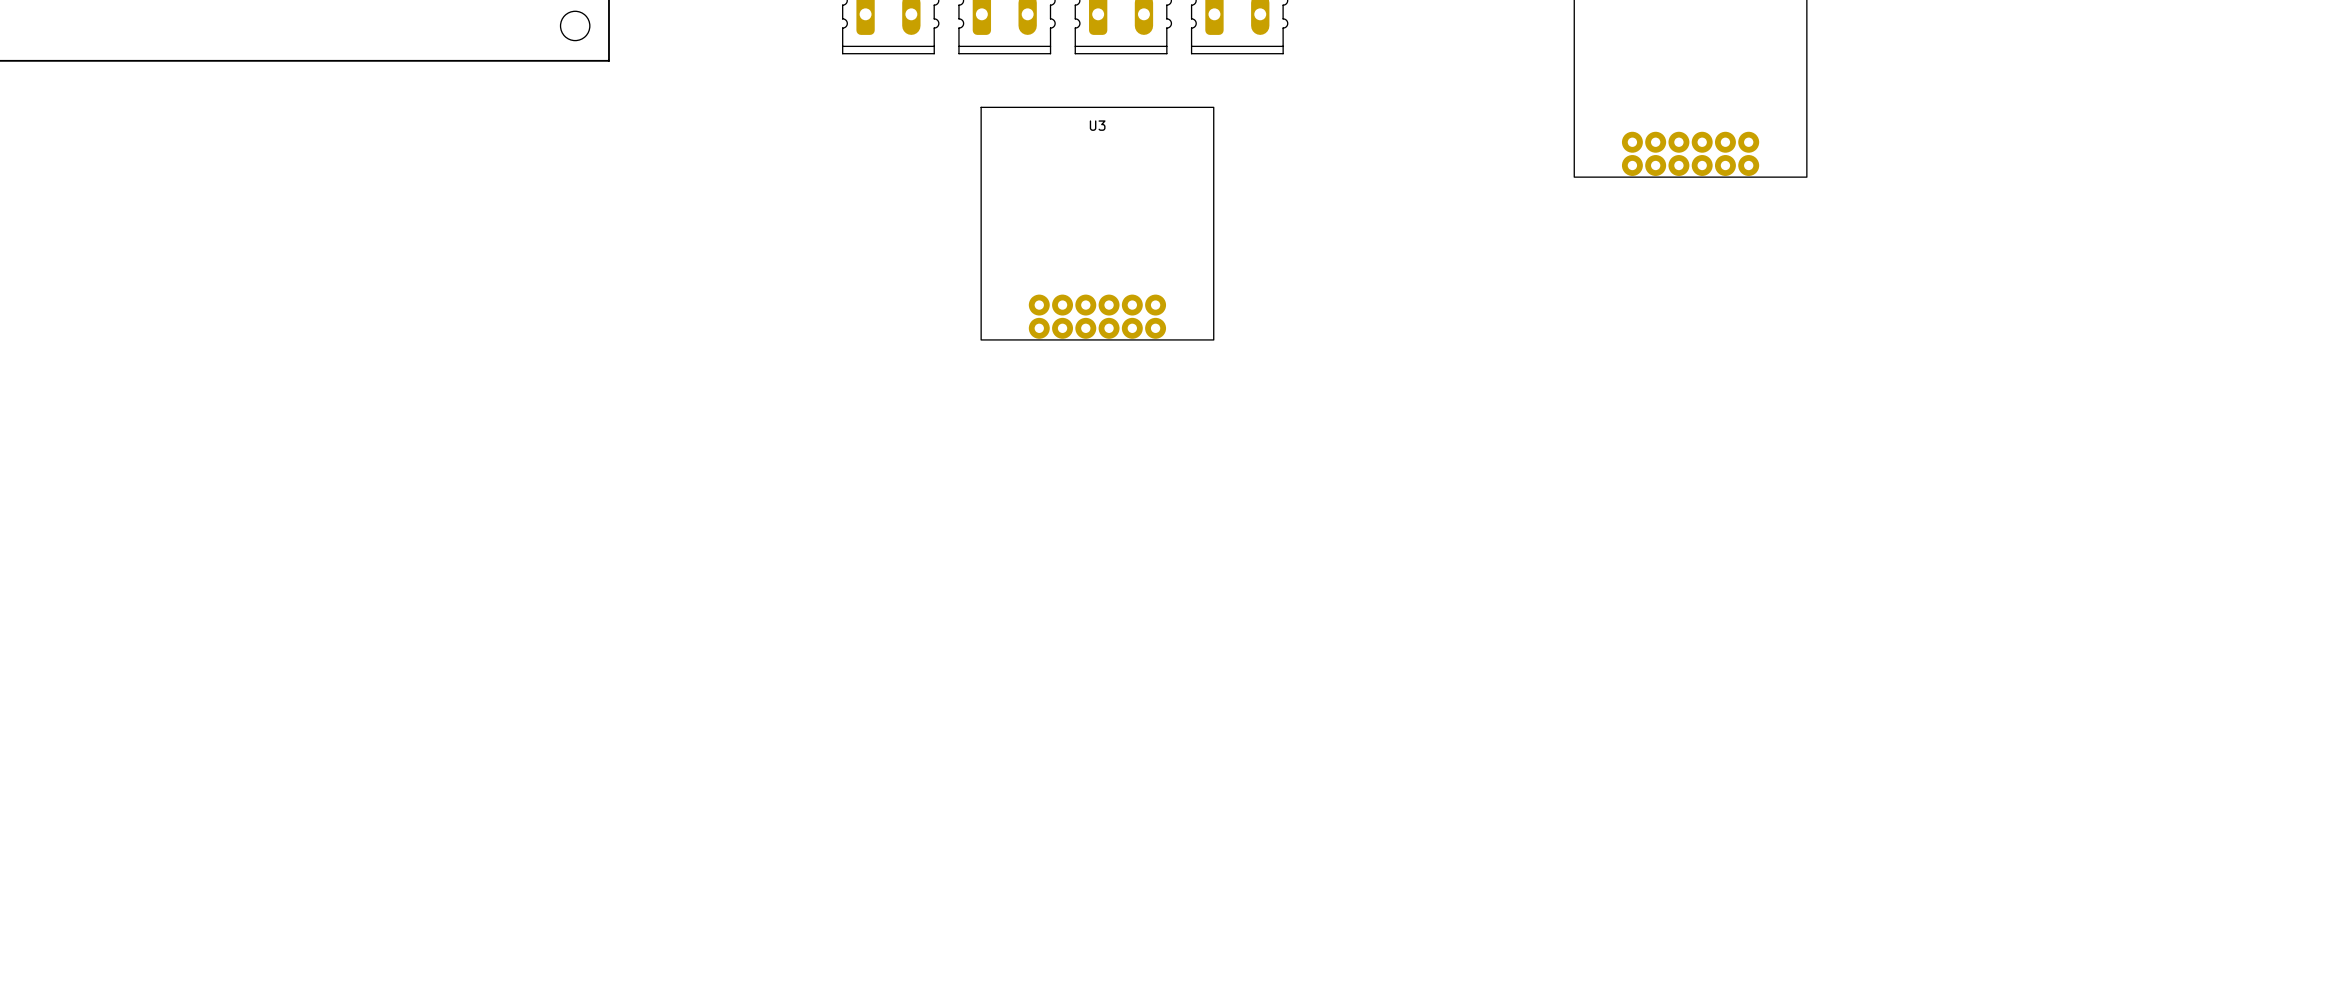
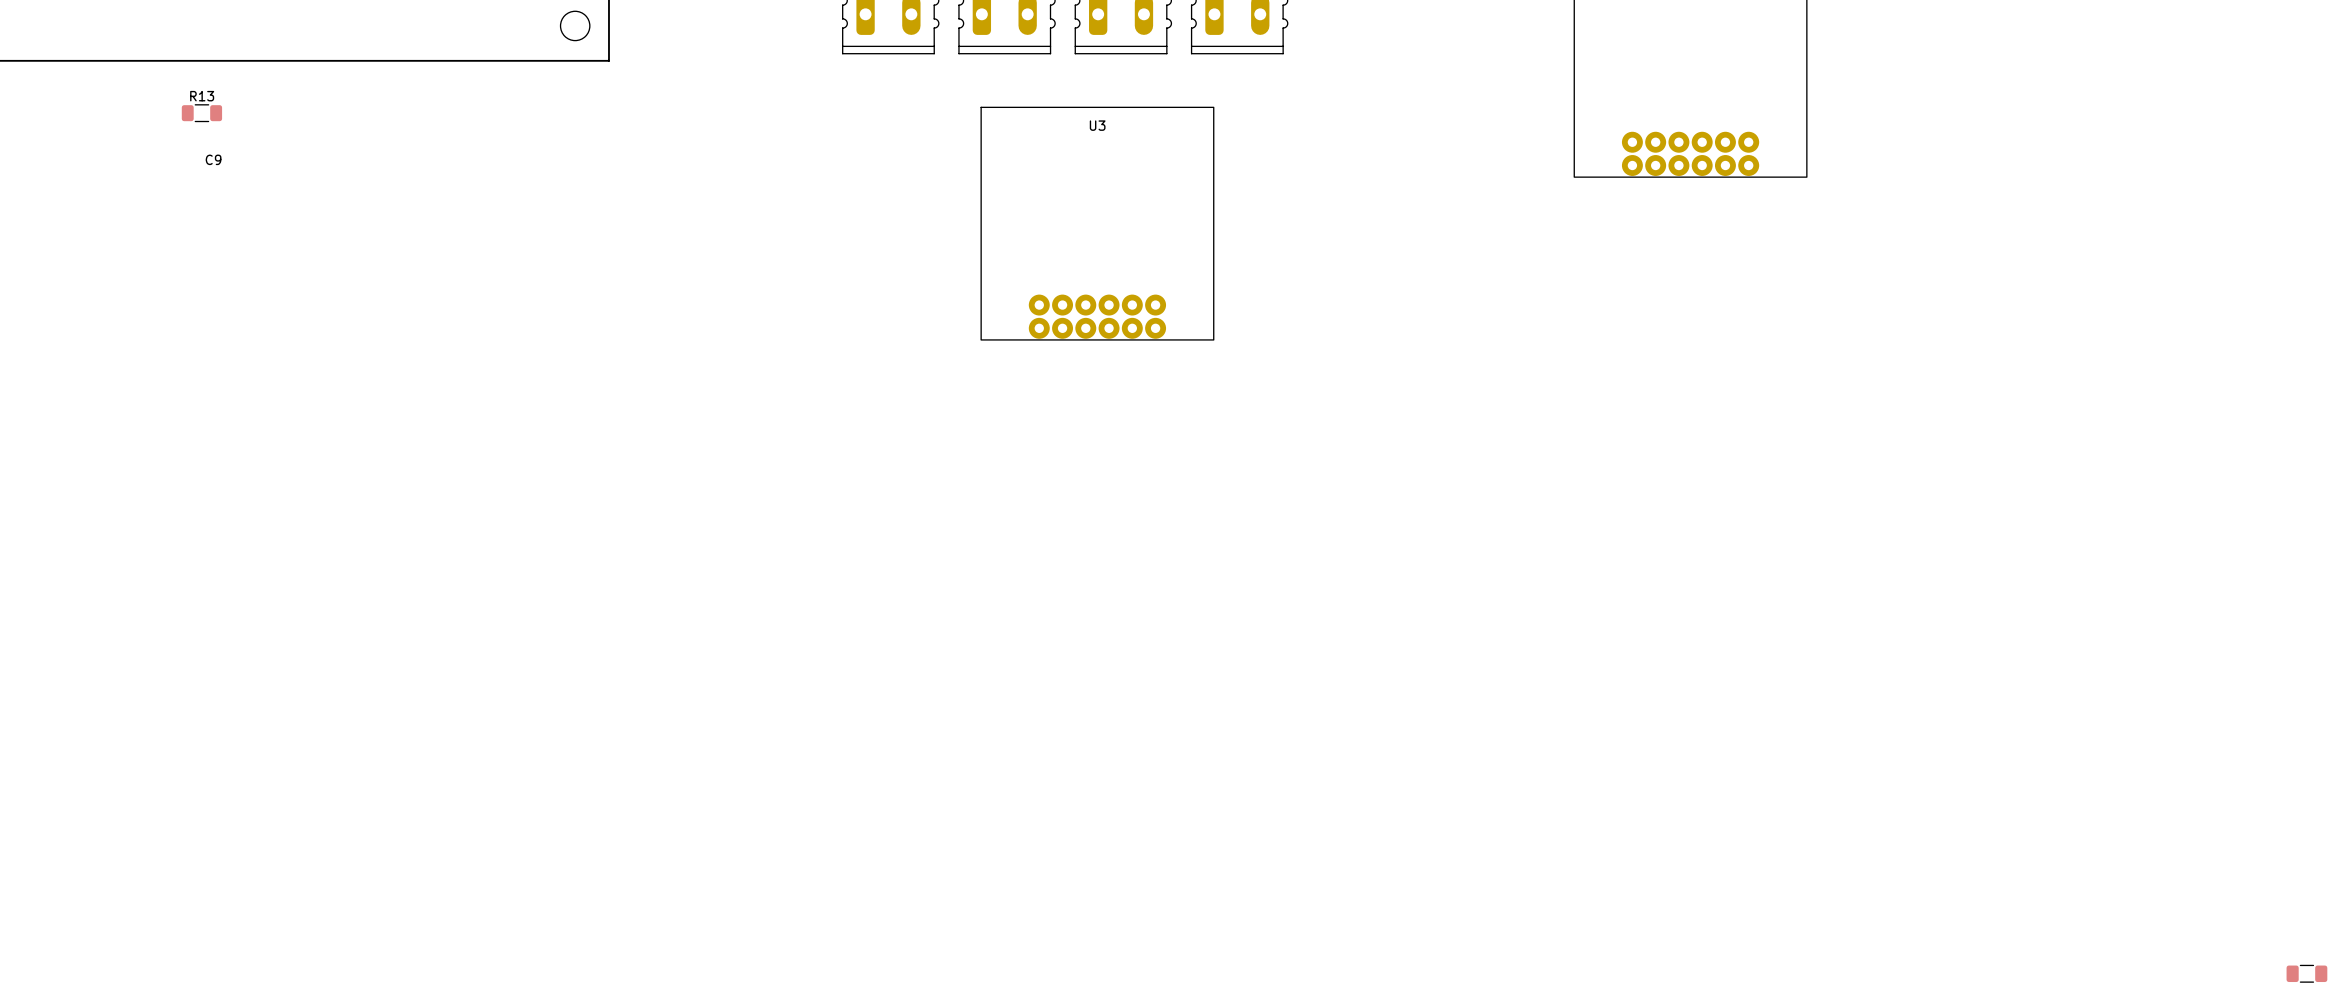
R13: none -> (201, 113)
C9: none -> (2306, 973)

